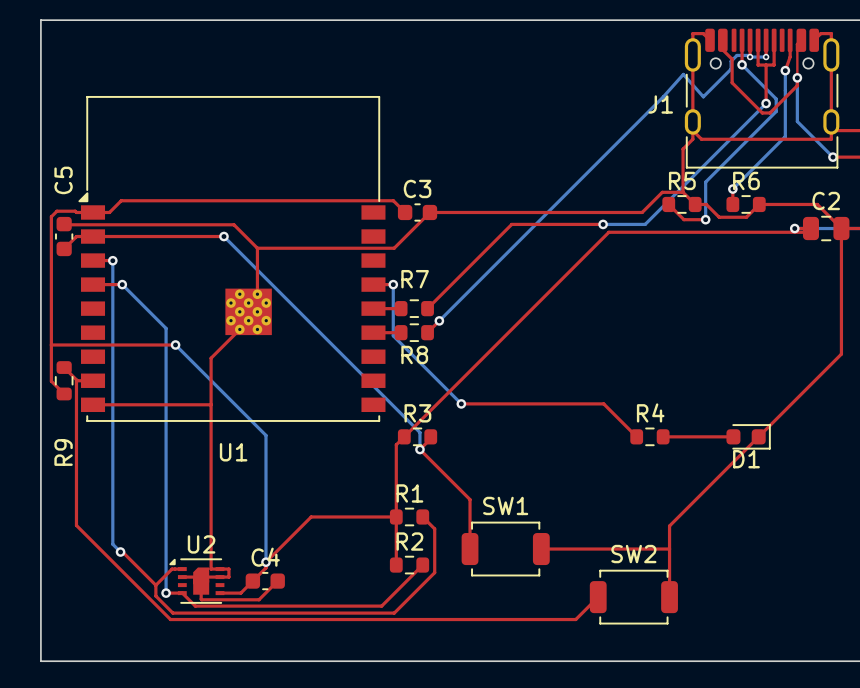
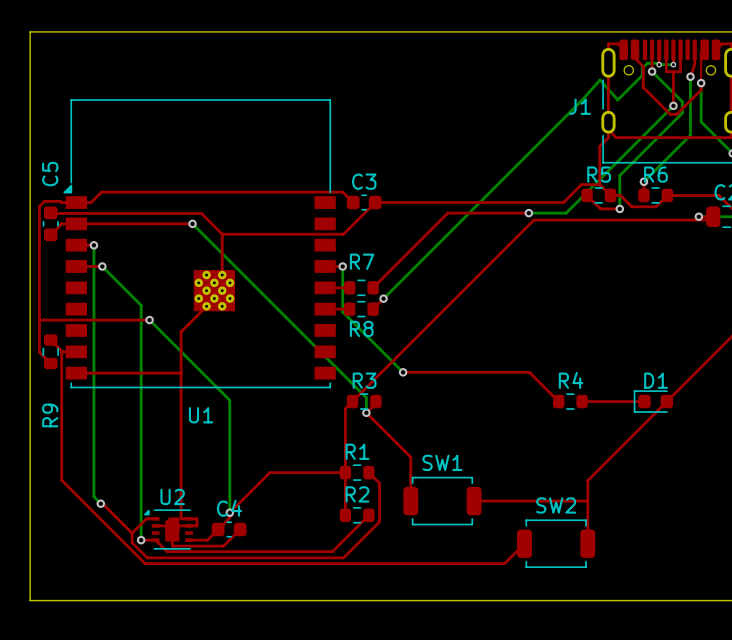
D1 rotation: 0° (748, 436) -> 180° (653, 401)

